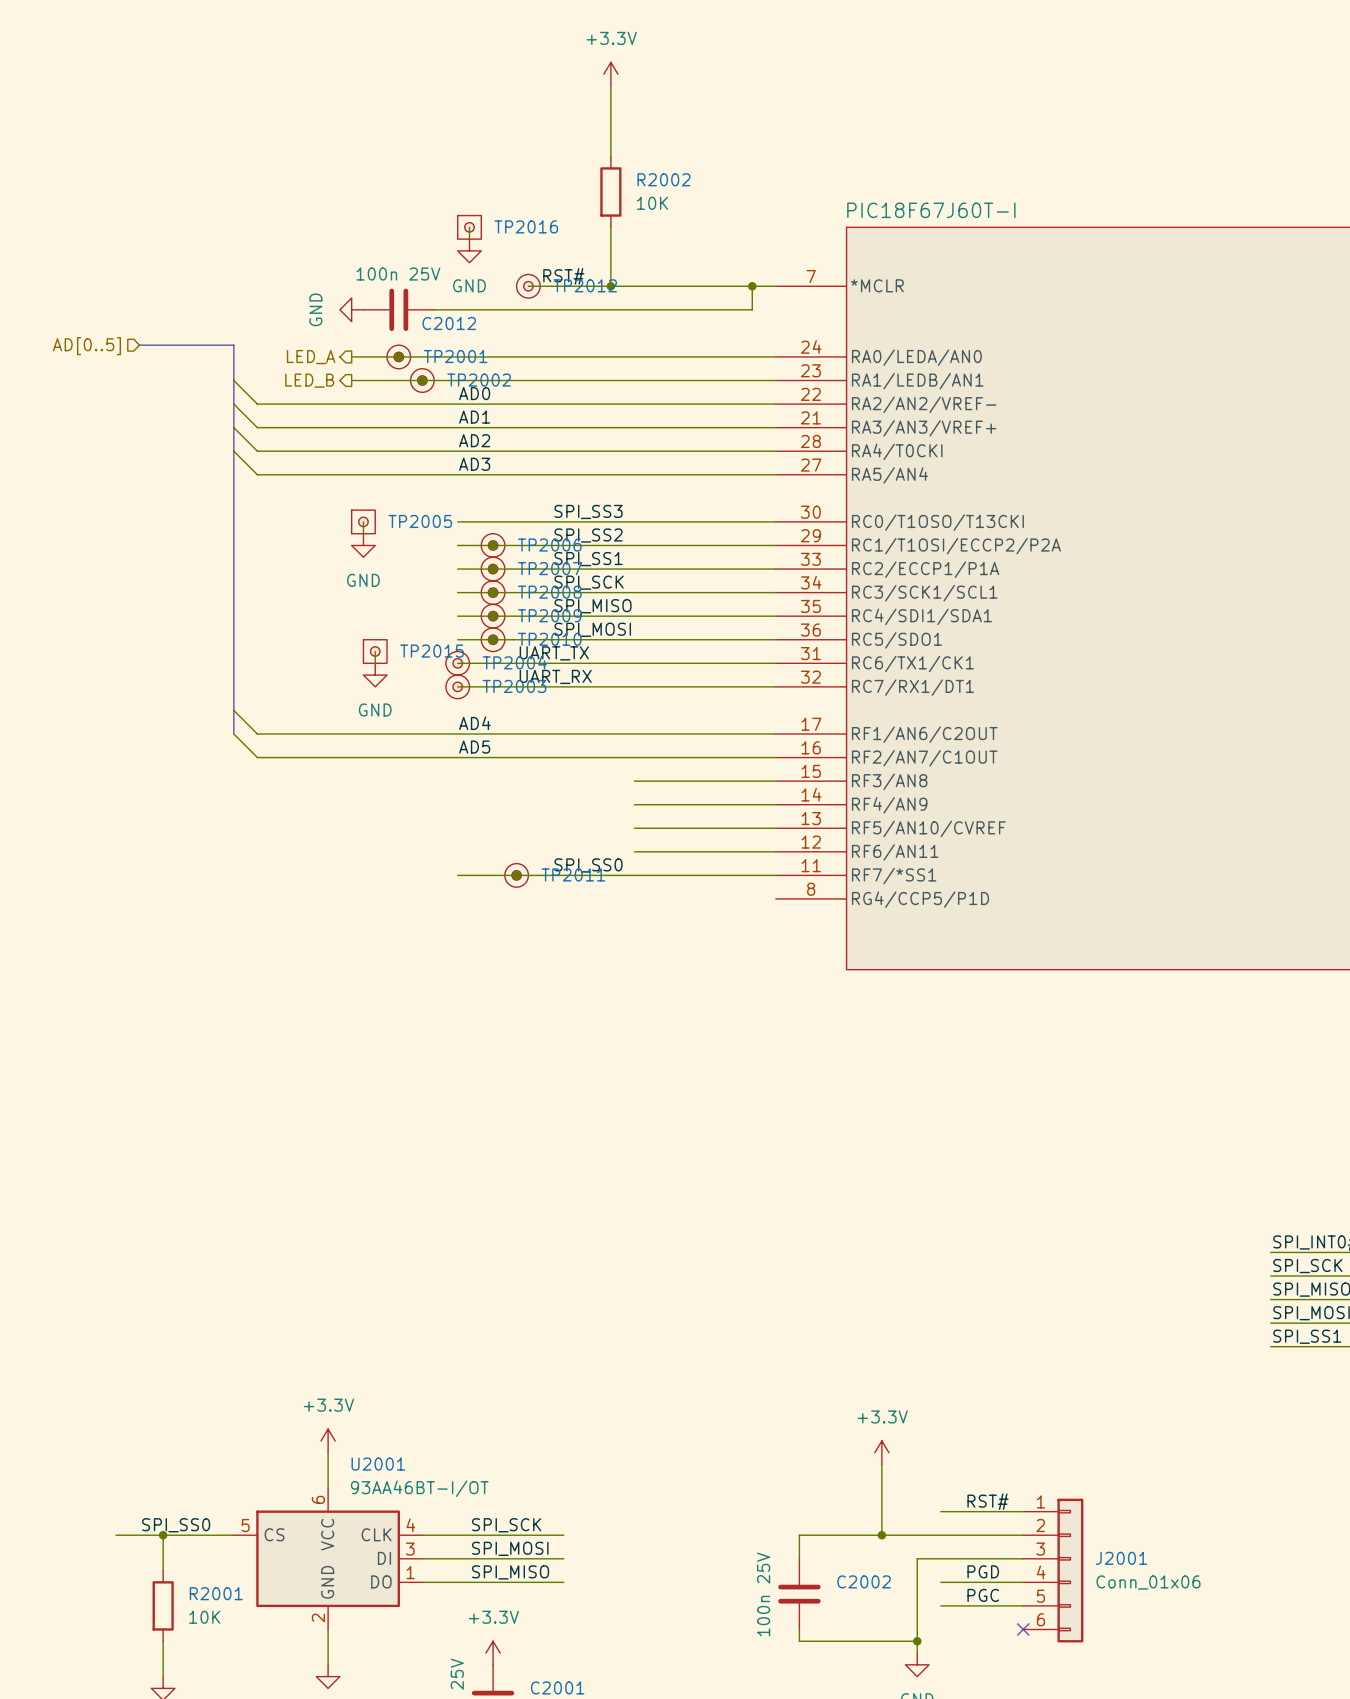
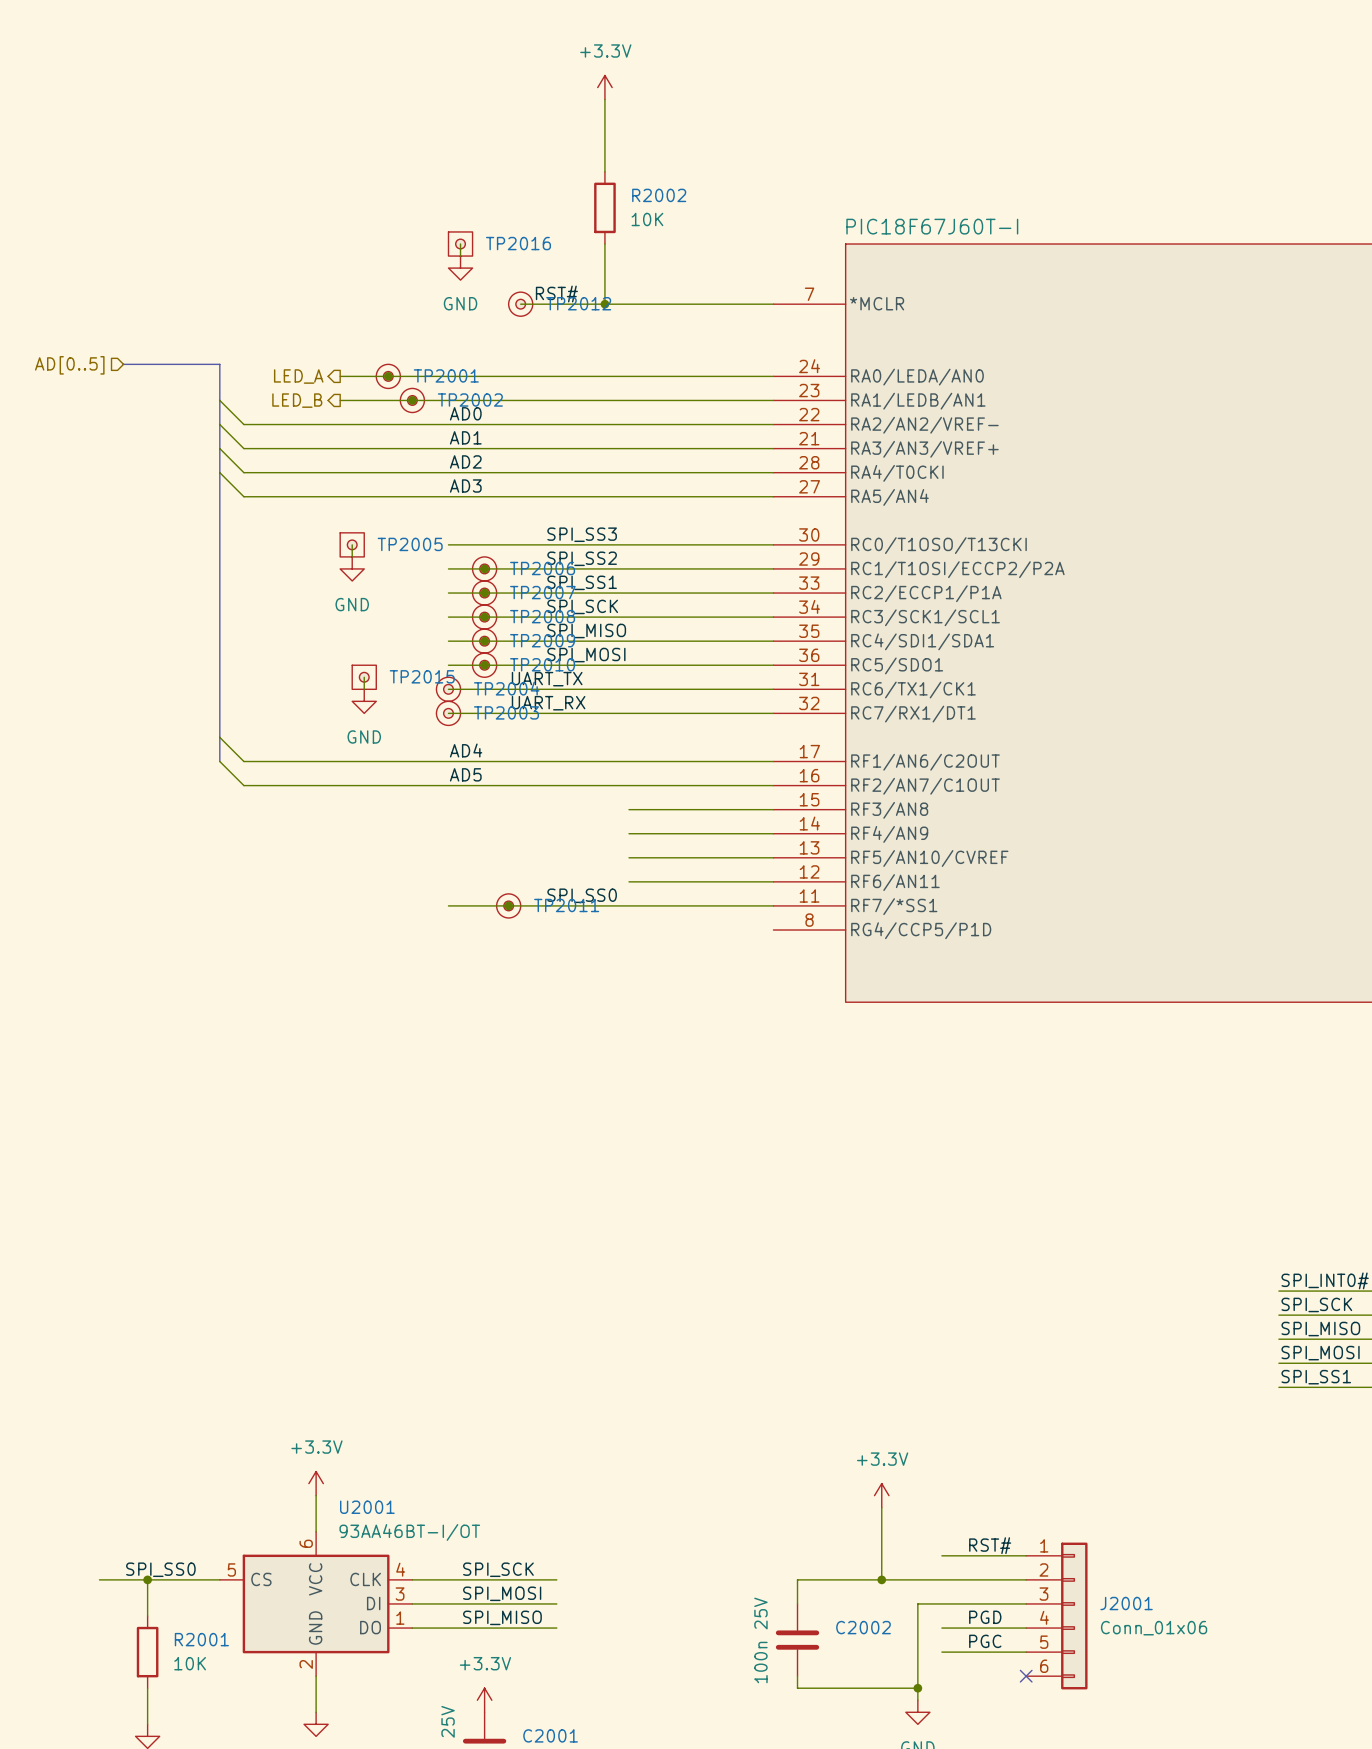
wire: (752, 286) (752, 309) (434, 309) -> none
junction: (752, 286) -> none
power symbol: GND (351, 309) -> none
C2012: 100n 25V (398, 309) -> none

